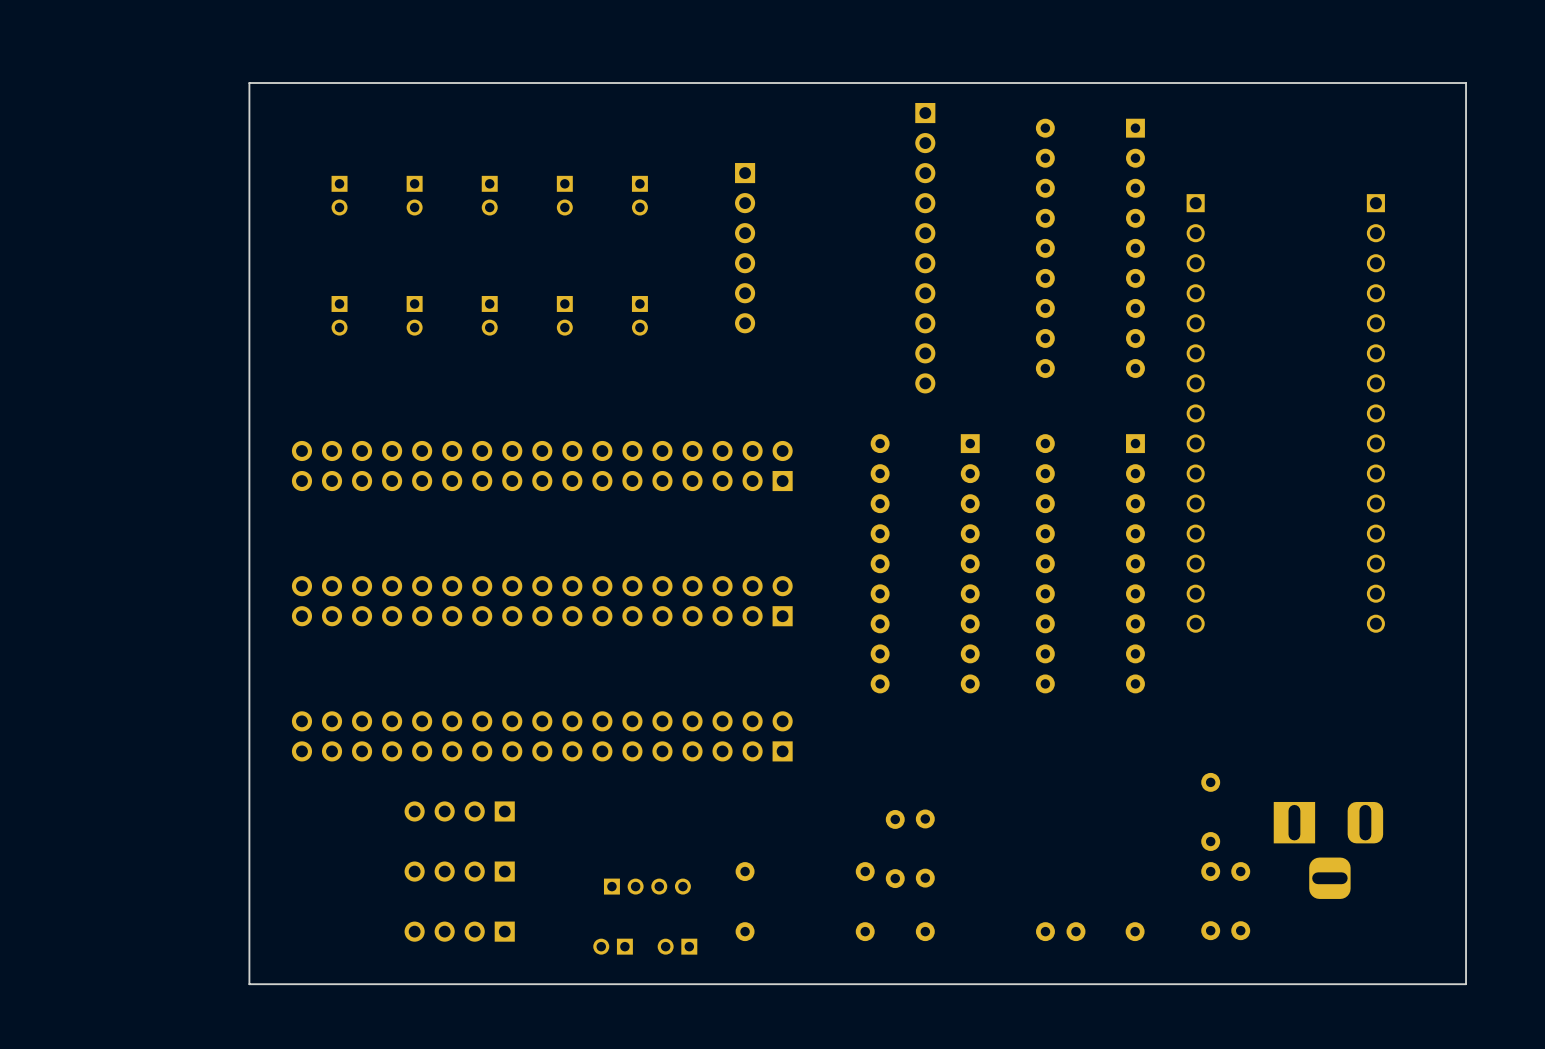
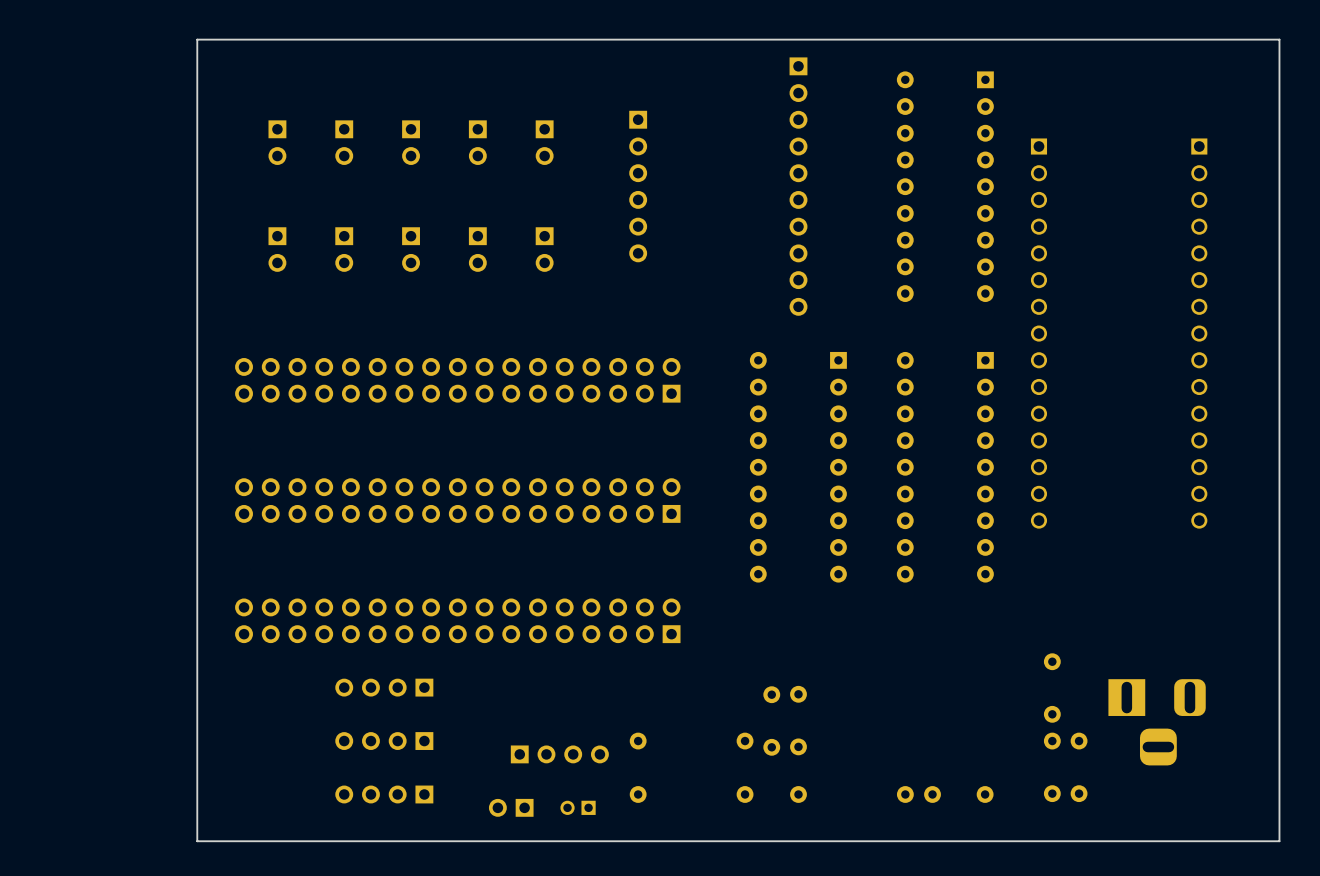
part footprint: [331, 175, 348, 216] -> [268, 120, 287, 165]
part footprint: [406, 175, 423, 216] -> [335, 120, 354, 165]
part footprint: [481, 175, 498, 216] -> [402, 120, 420, 165]
part footprint: [556, 175, 573, 216] -> [468, 120, 487, 165]
part footprint: [631, 175, 648, 216] -> [535, 120, 554, 165]
part footprint: [331, 296, 348, 336] -> [268, 227, 287, 272]
part footprint: [406, 296, 423, 336] -> [335, 227, 354, 272]
part footprint: [481, 296, 498, 336] -> [402, 227, 420, 272]
part footprint: [556, 296, 573, 336] -> [468, 227, 487, 272]
part footprint: [631, 296, 648, 336] -> [535, 227, 554, 272]
part footprint: [603, 878, 691, 895] -> [510, 745, 609, 764]
part footprint: [593, 938, 633, 955] -> [488, 798, 534, 817]

